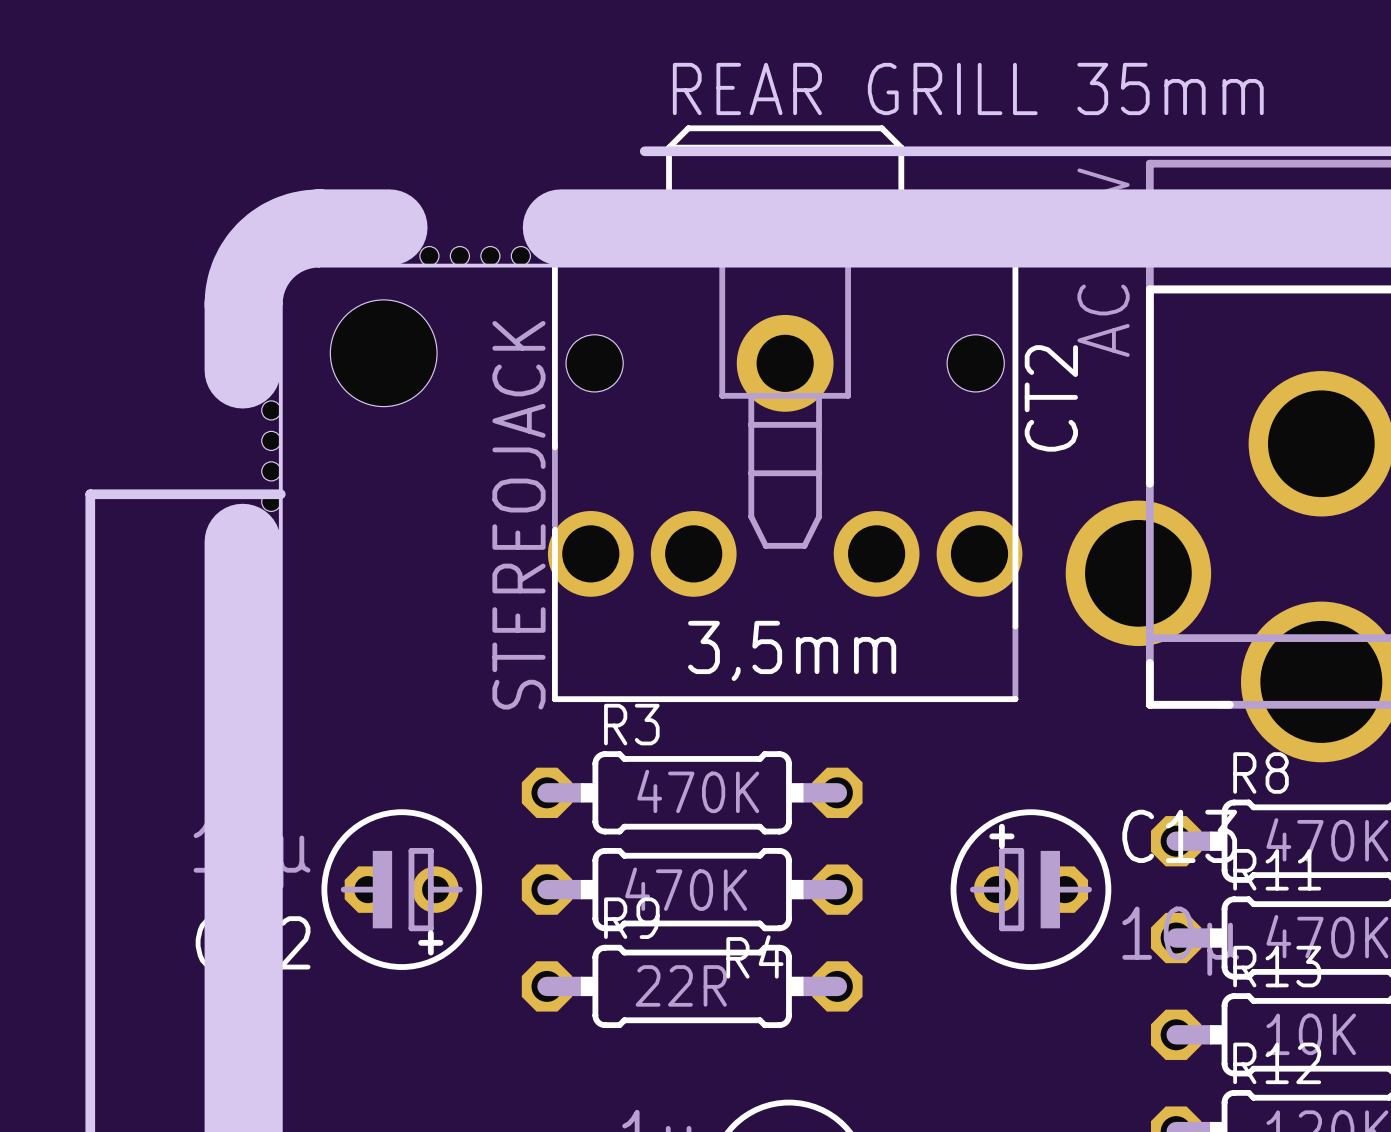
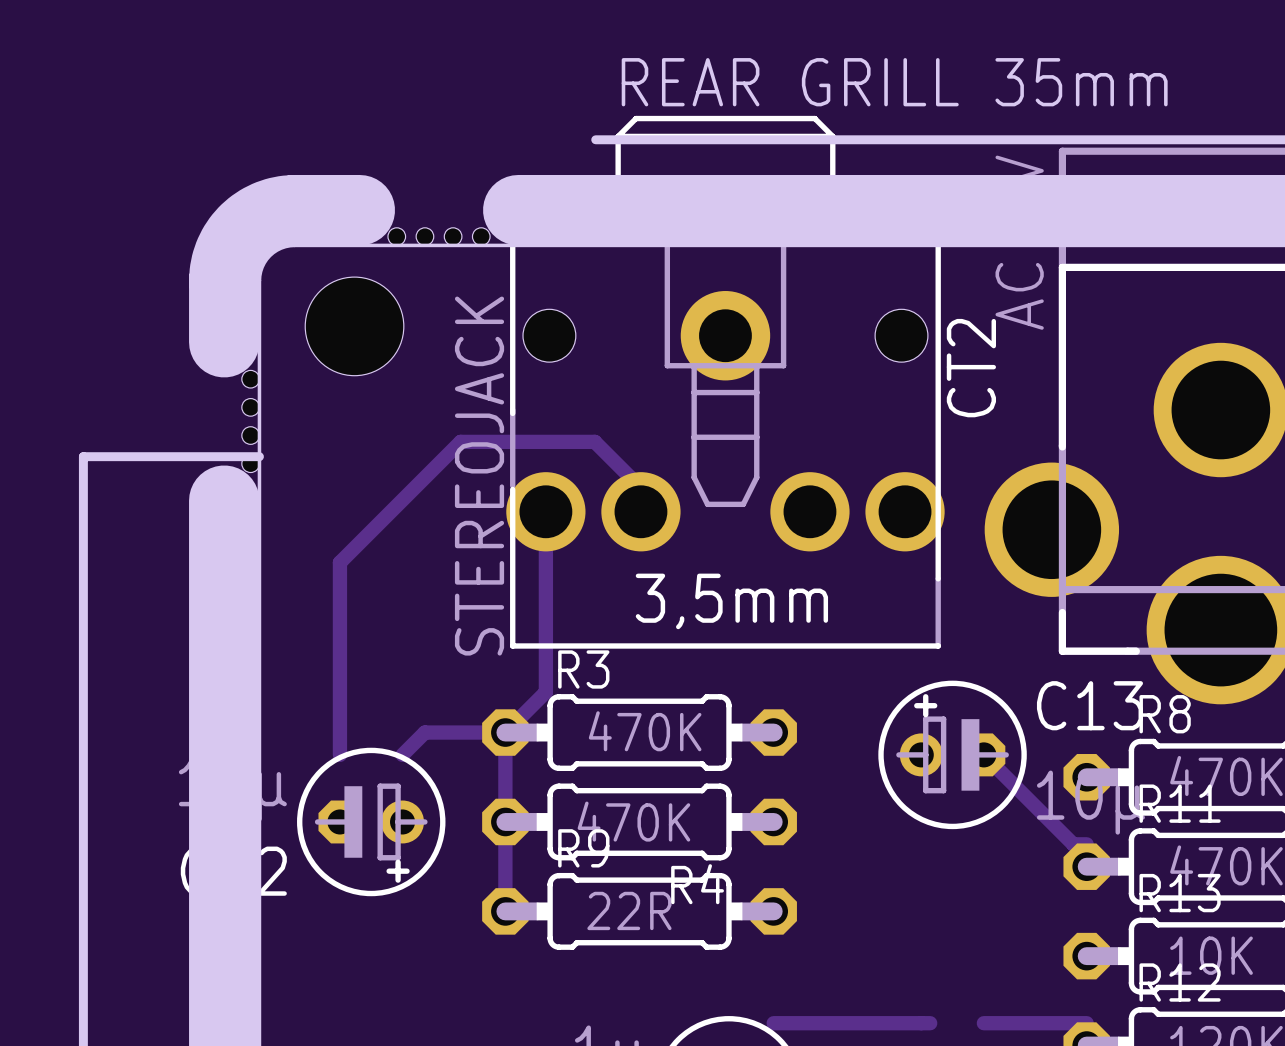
track: none -> (545, 525) (545, 692) (505, 732)
track: none -> (640, 525) (639, 486) (594, 441) (460, 441) (339, 562) (339, 754)
track: none -> (505, 732) (505, 911)
track: none -> (505, 732) (424, 732) (402, 754)
track: none -> (983, 754) (1073, 844) (1086, 844)
C13 position: (1030, 889) -> (952, 754)
track: none -> (773, 1023) (930, 1023)
track: none -> (983, 1023) (1086, 1023)

